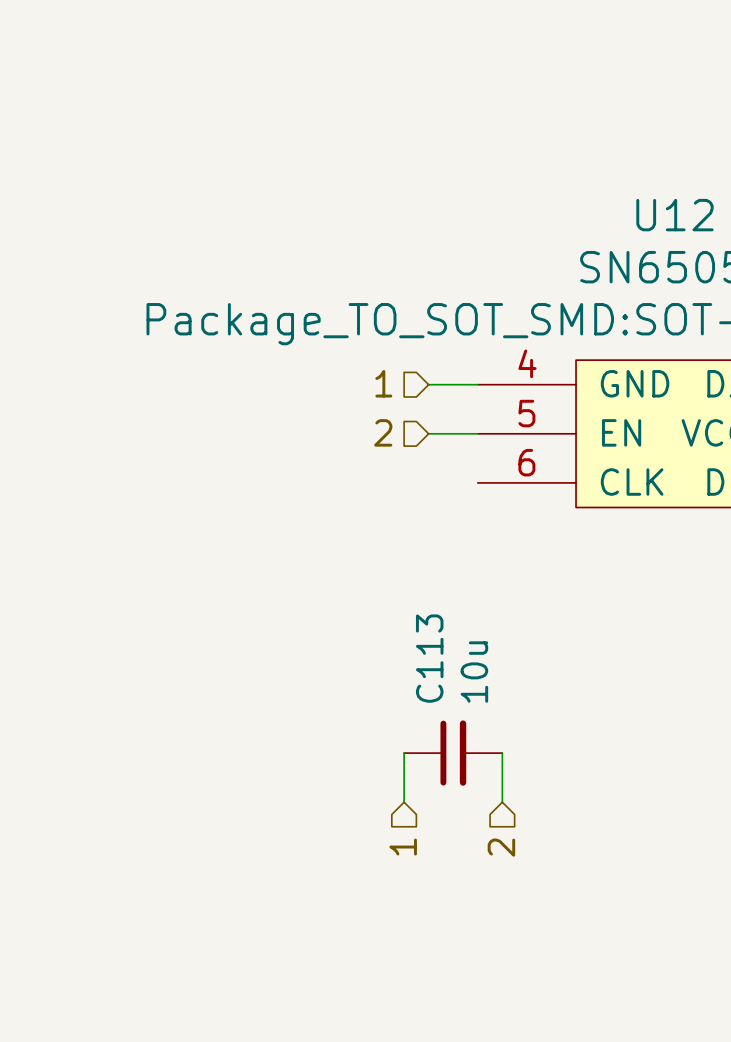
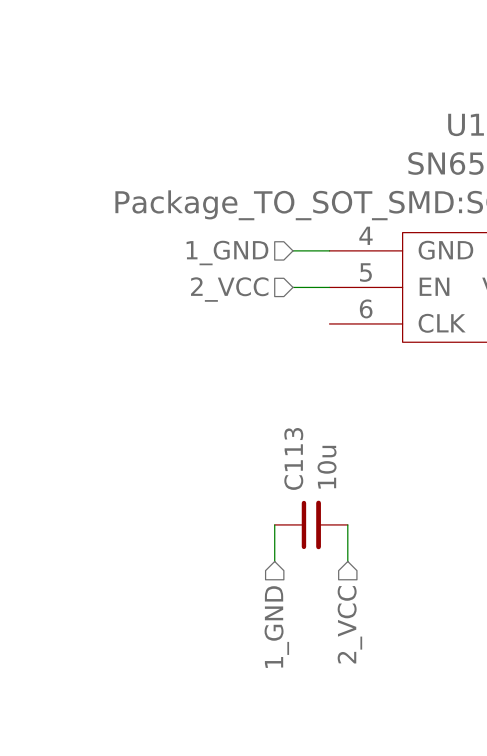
hierarchical label: 1 (383, 383) -> 1_GND (227, 253)
hierarchical label: 2 (383, 432) -> 2_VCC (229, 289)
hierarchical label: 1 (403, 847) -> 1_GND (276, 627)
hierarchical label: 2 (501, 847) -> 2_VCC (349, 624)

